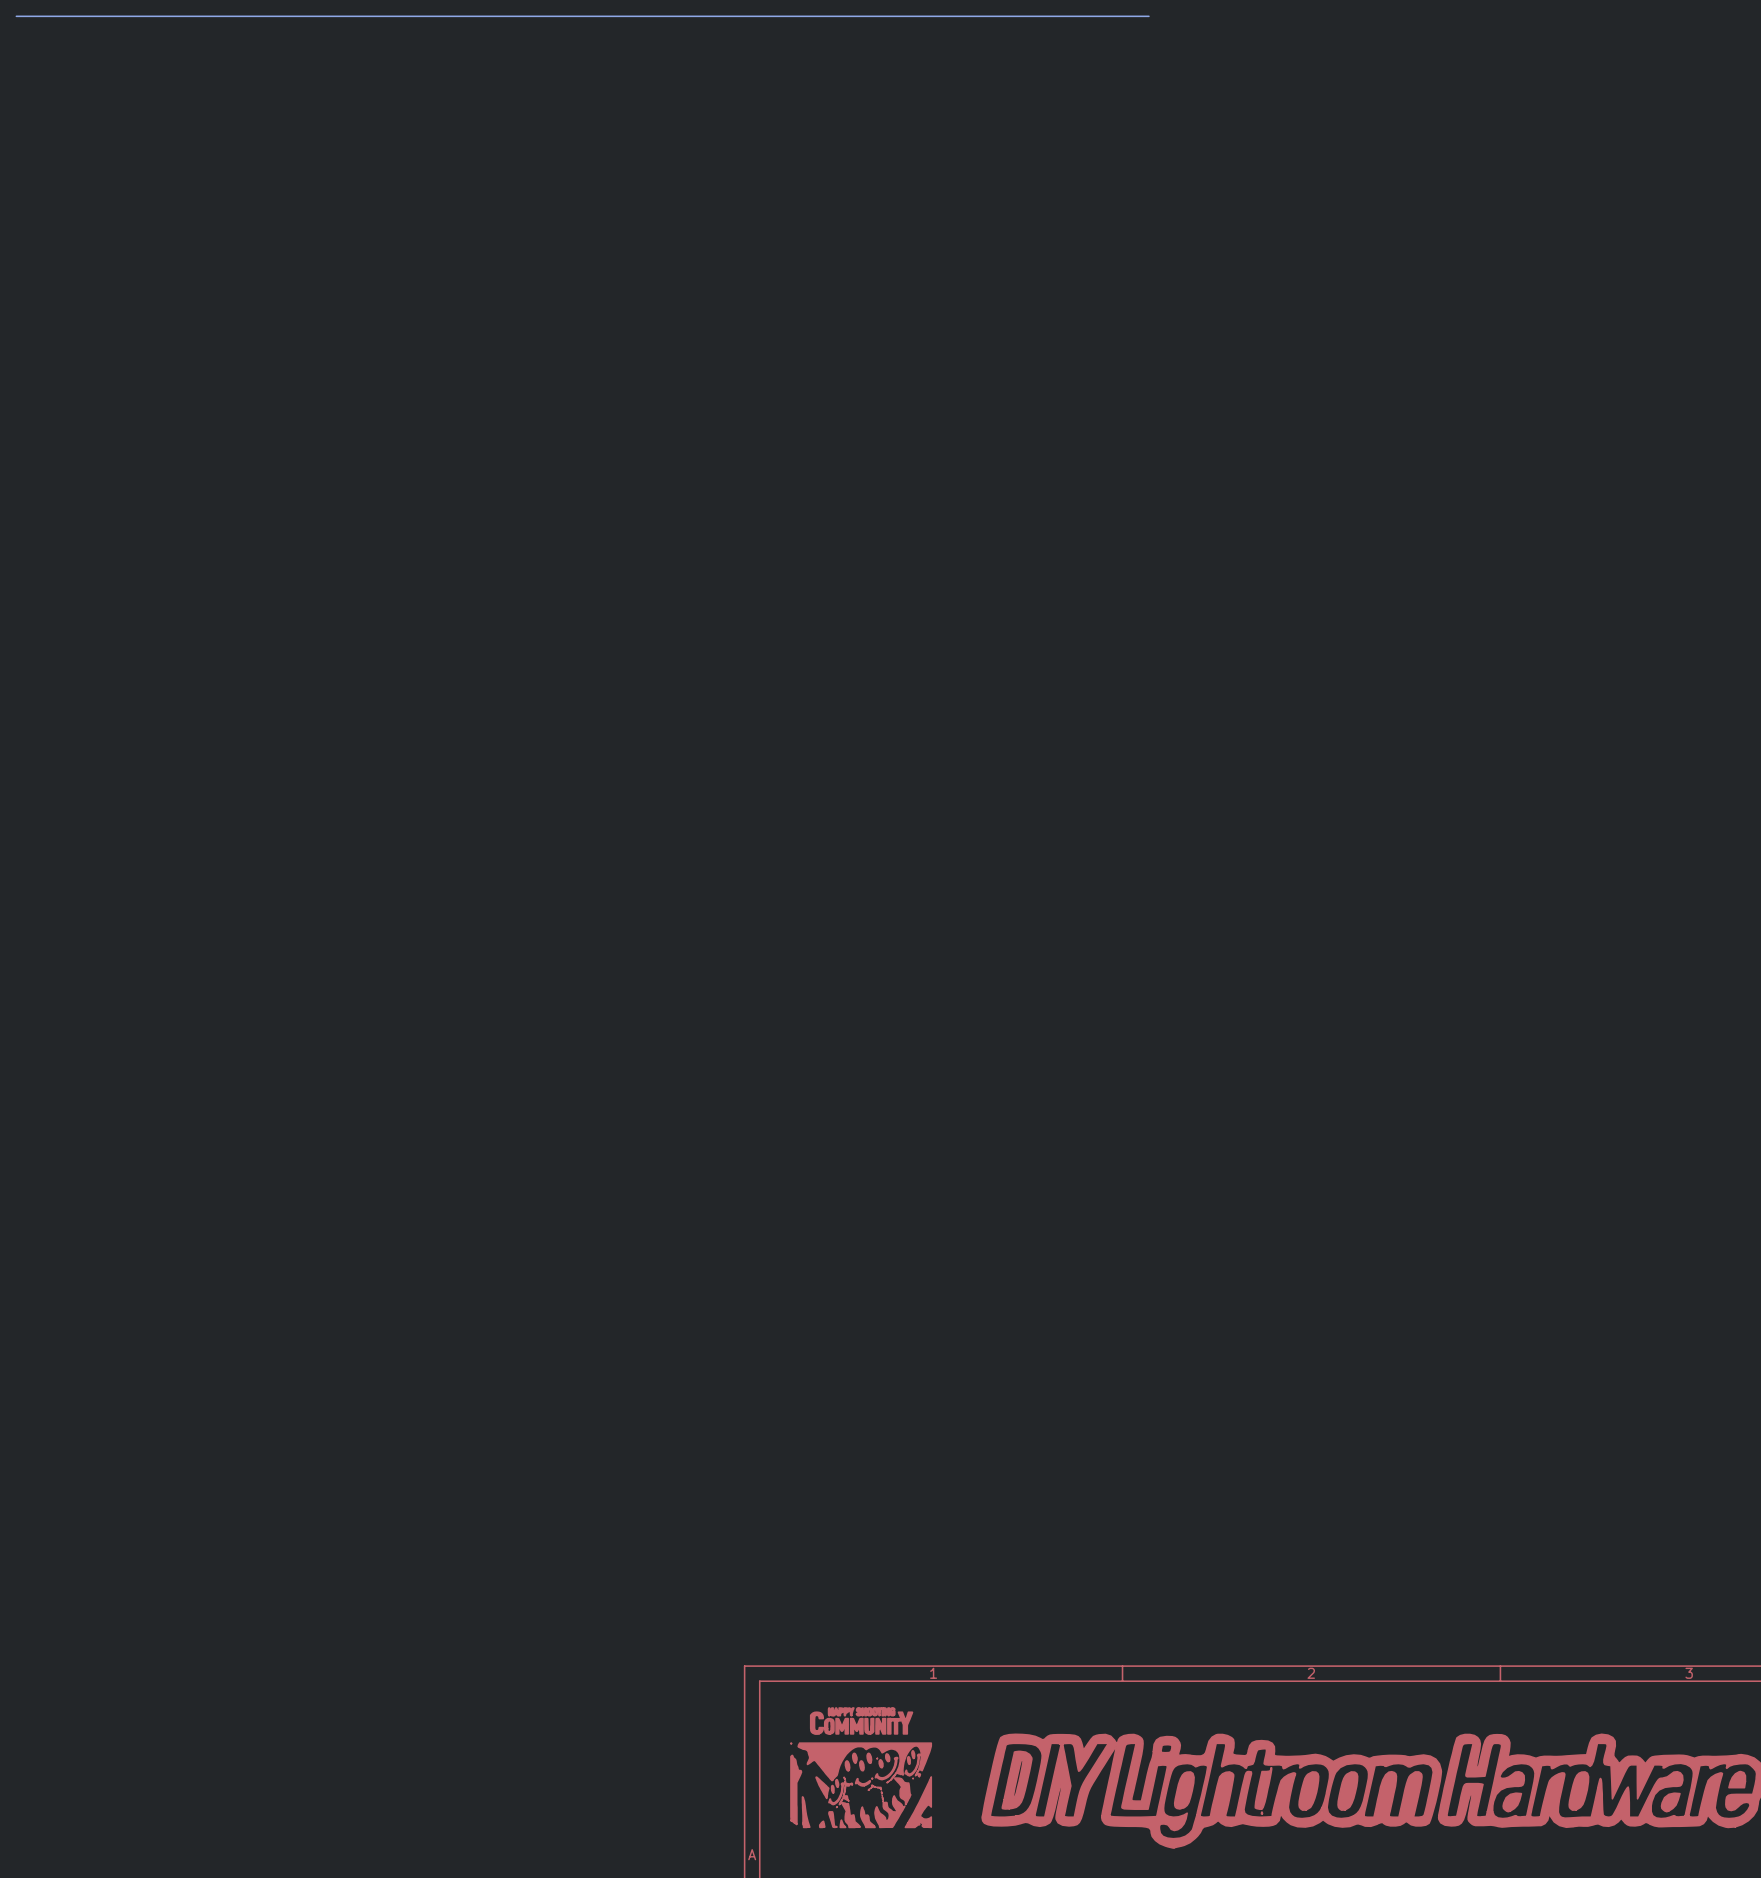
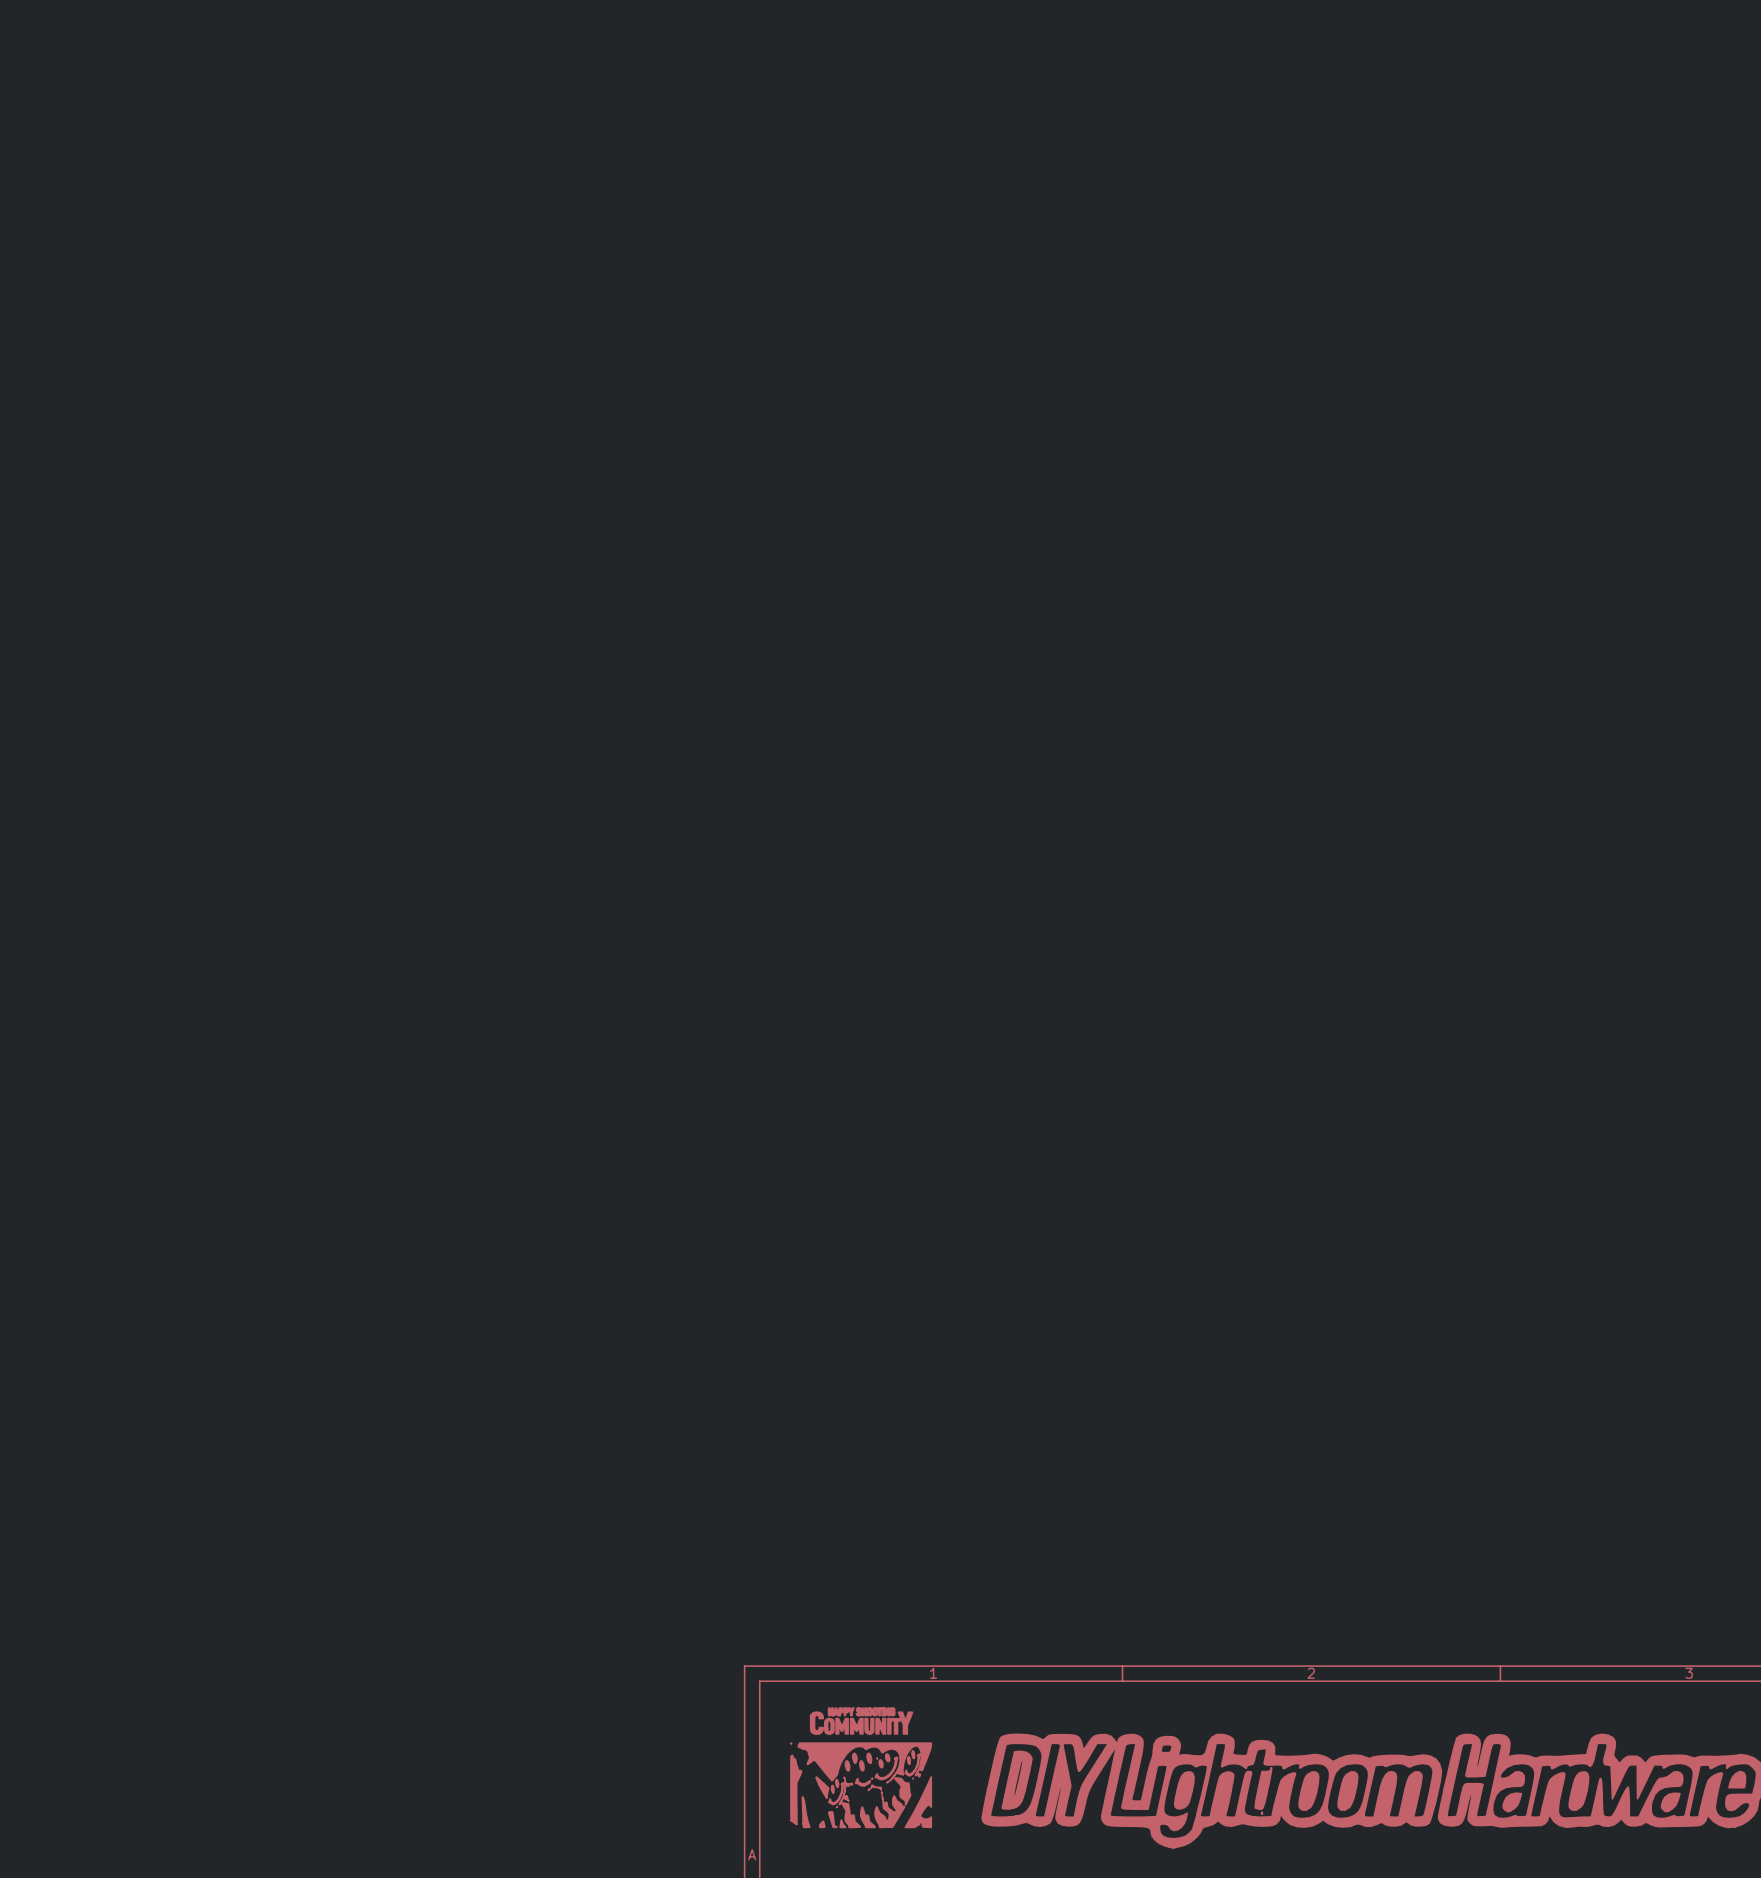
bus: (16, 16) (1148, 16) -> none

